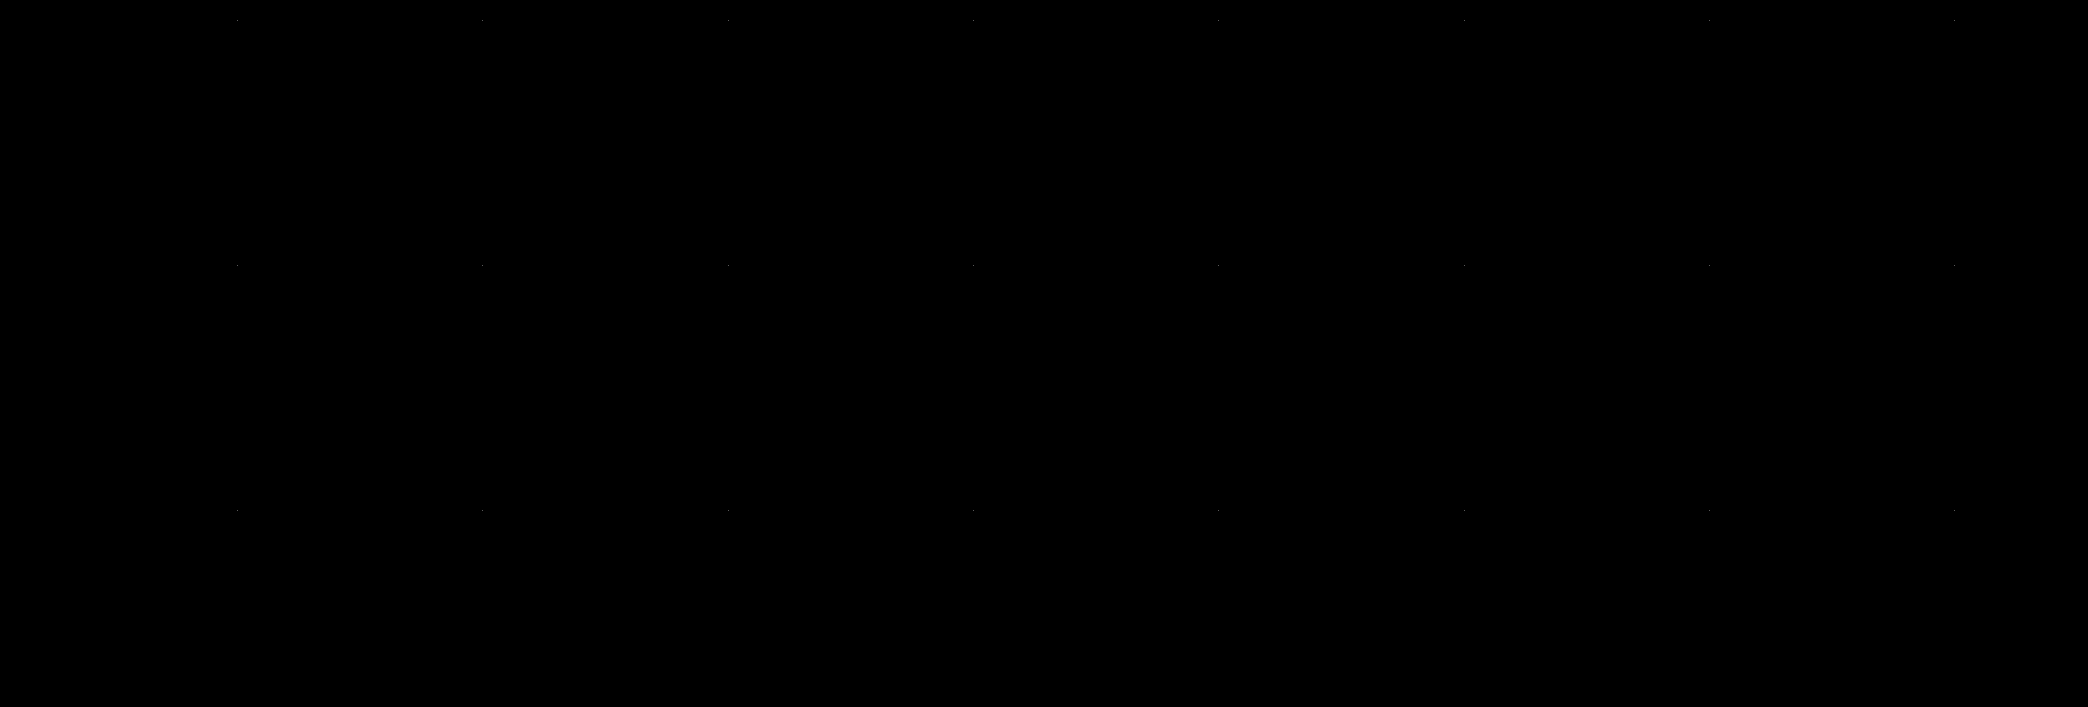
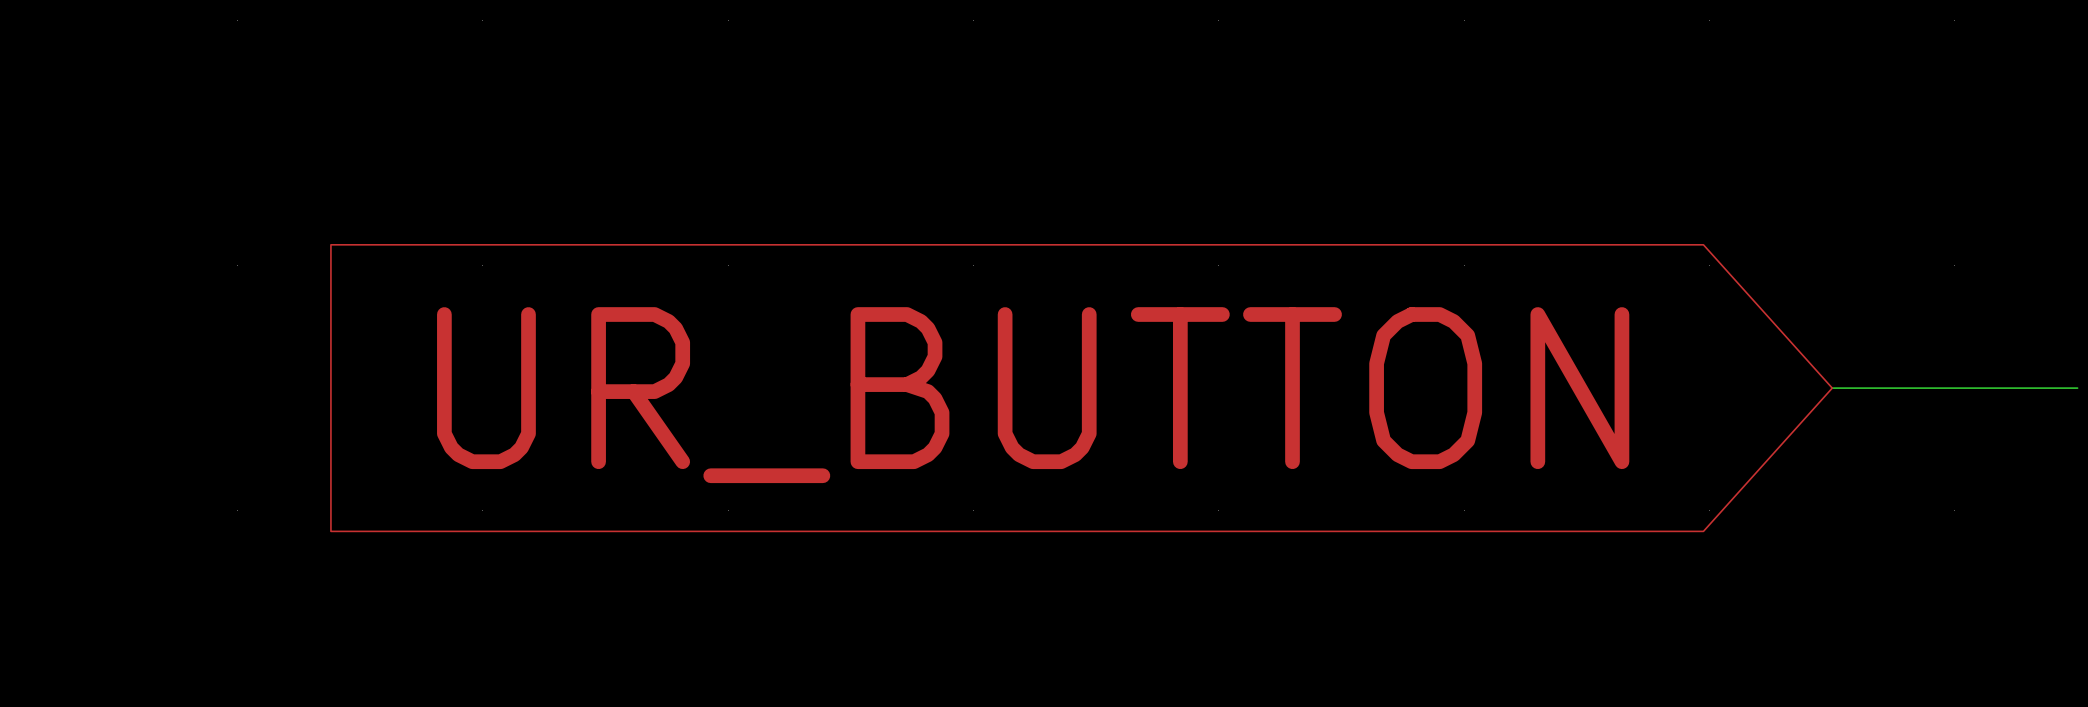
wire: none -> (1832, 388) (2077, 388)
global label: none -> UR_BUTTON (1033, 395)

